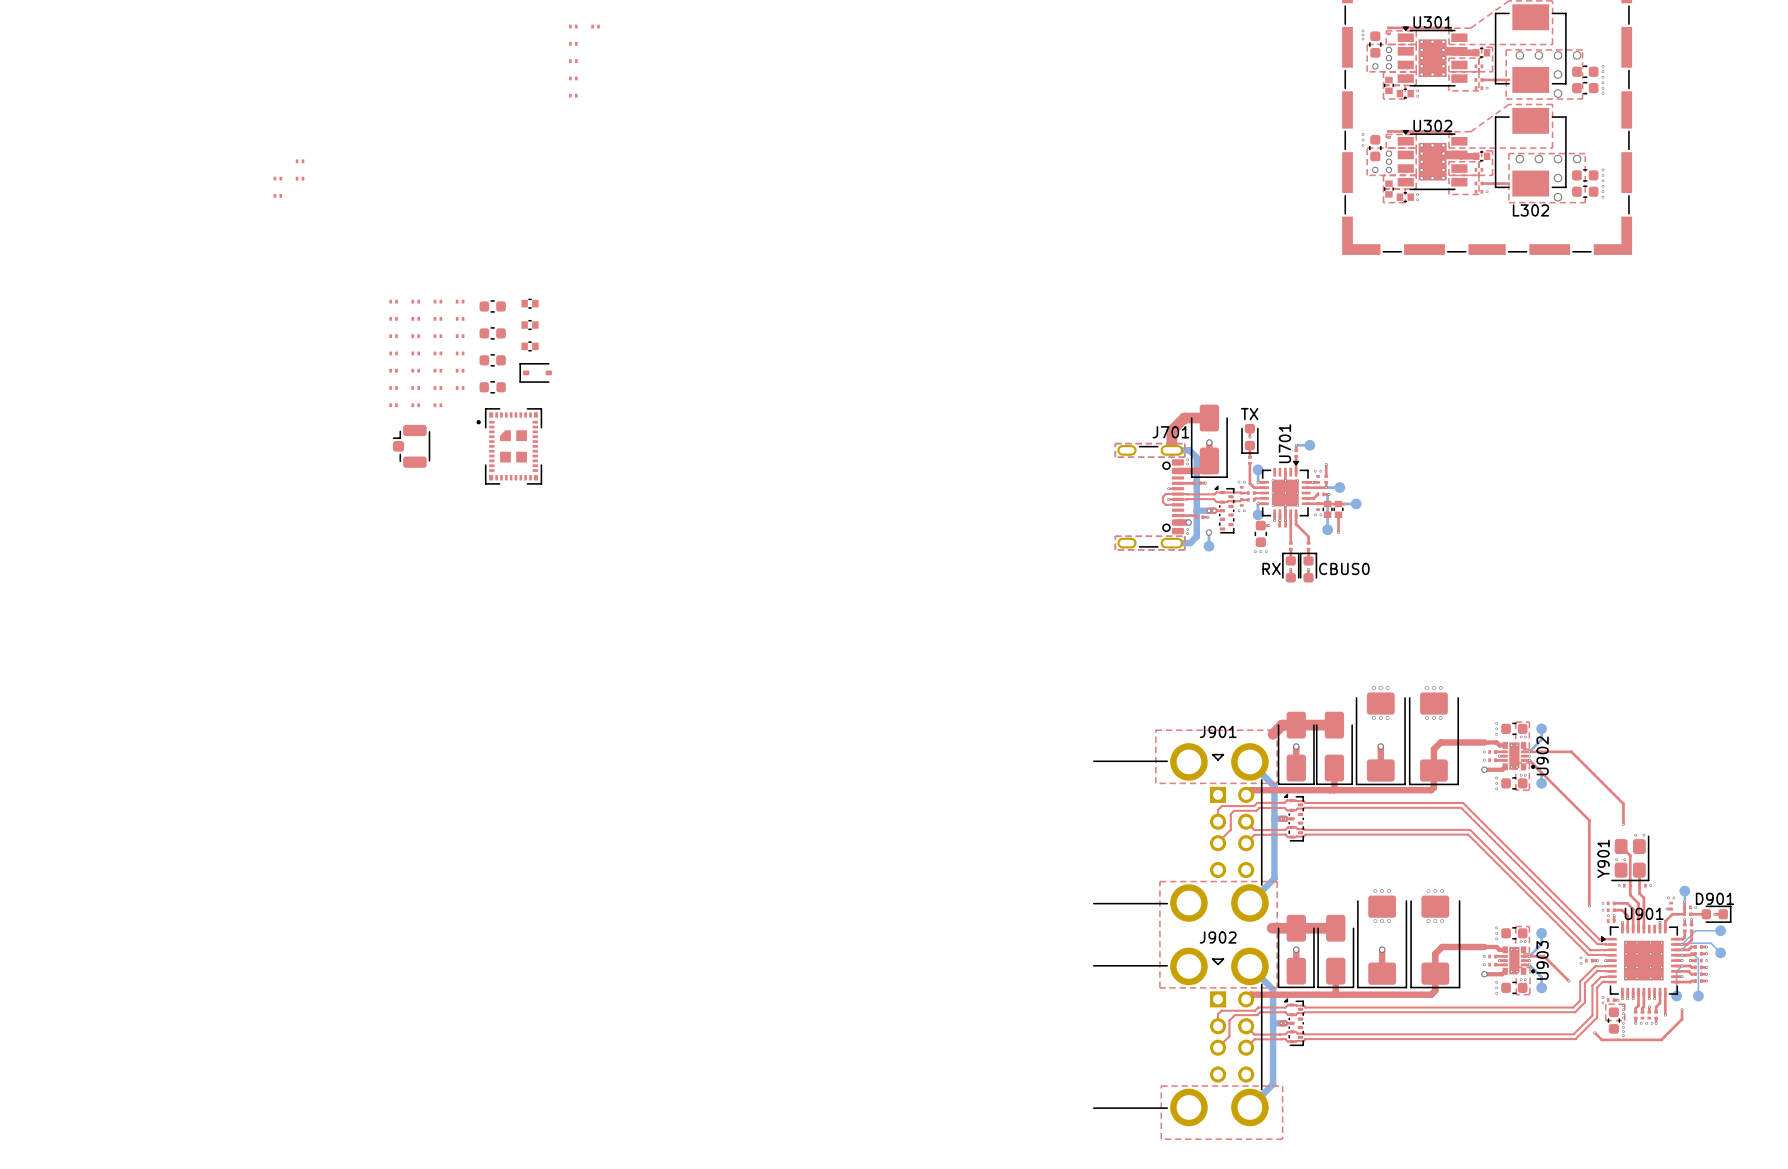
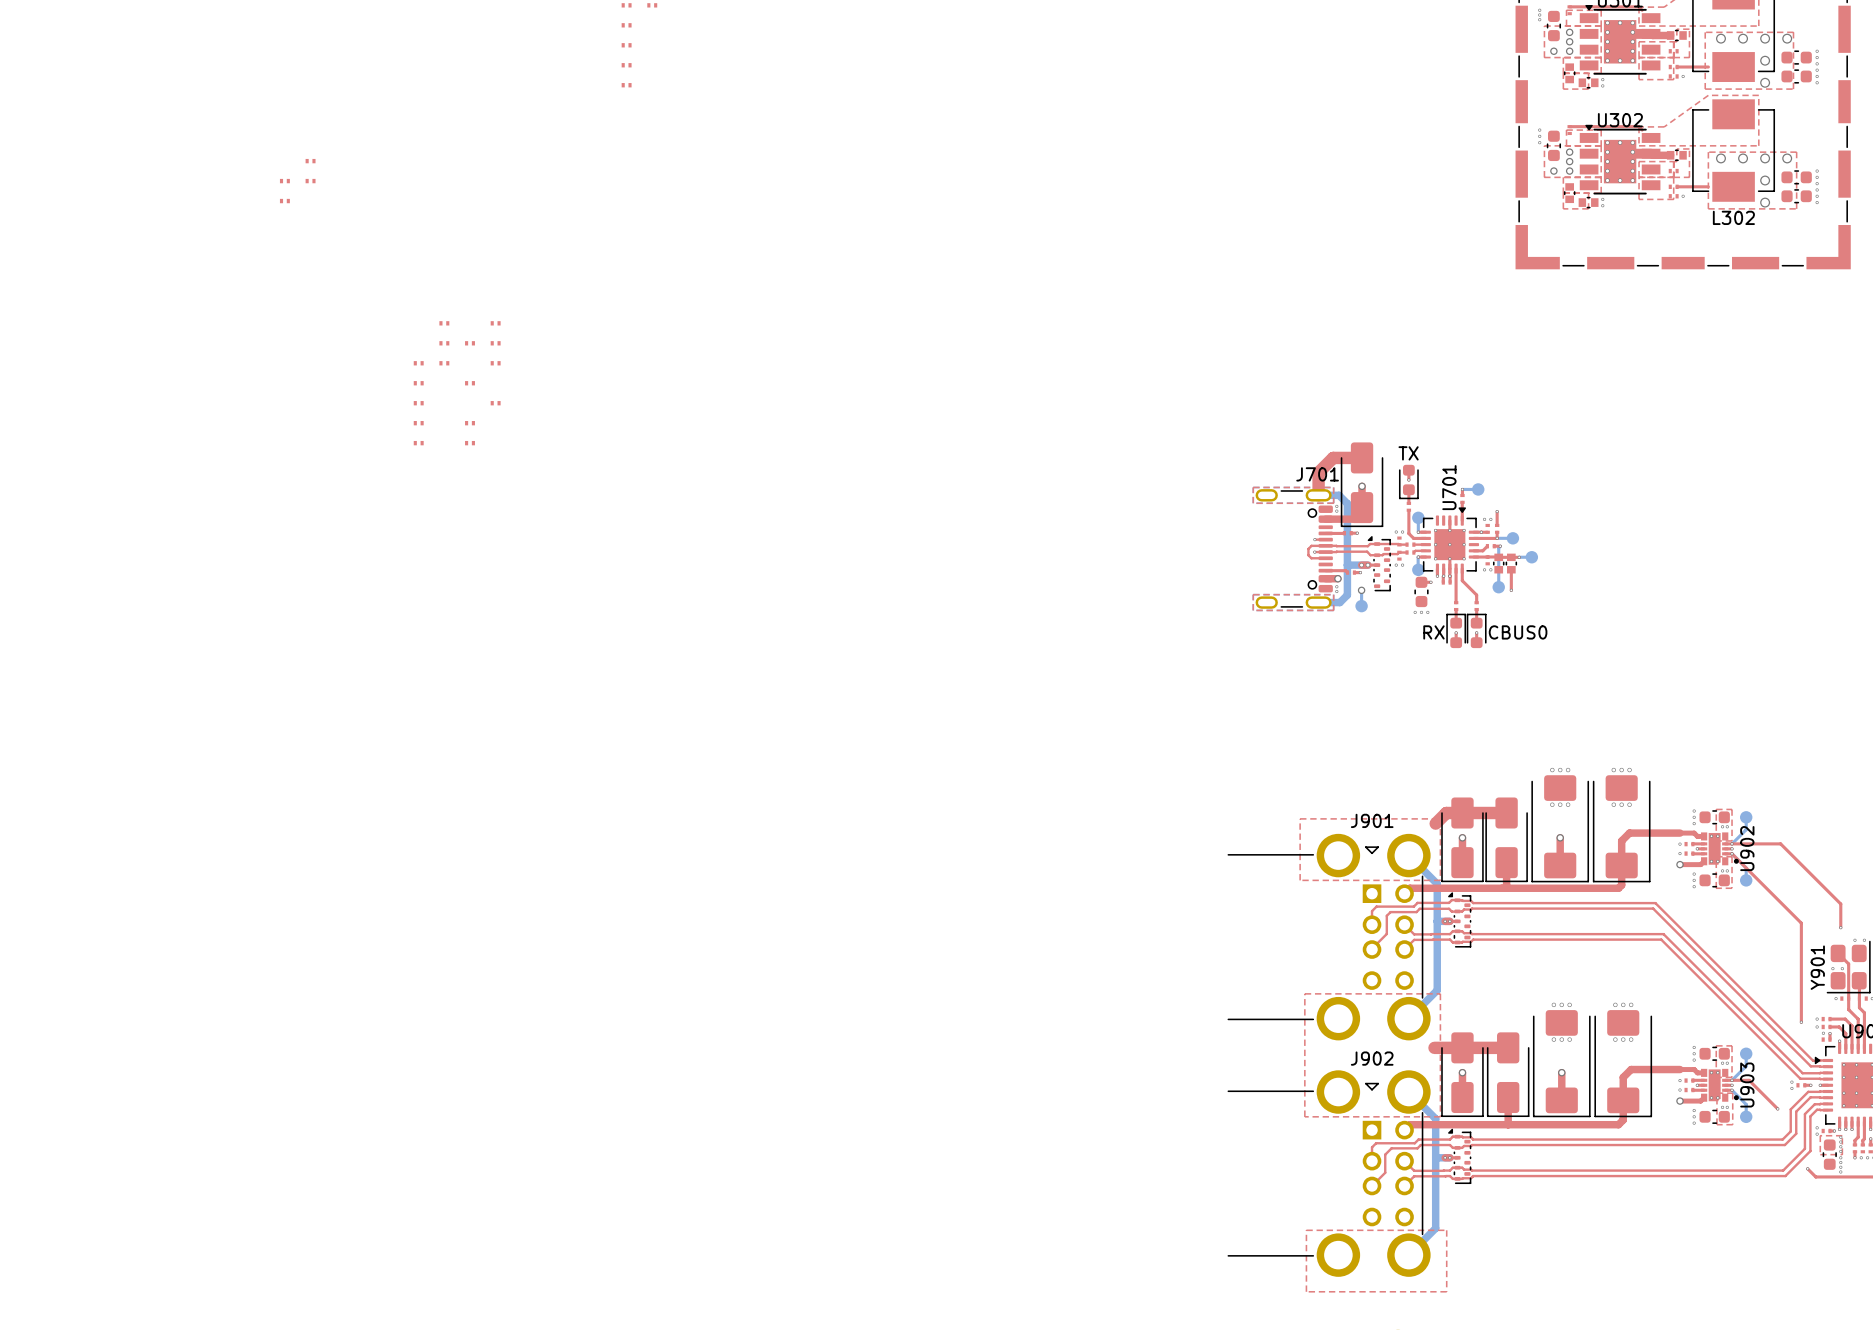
part: (393, 301) -> none
part: (437, 301) -> none
part: (530, 303) -> none
part: (492, 306) -> none
part: (393, 318) -> none
part: (530, 325) -> none
part: (492, 333) -> none
part: (437, 336) -> none
part: (530, 346) -> none
part: (415, 353) -> none
part: (460, 353) -> none
part: (492, 360) -> none
part: (415, 370) -> none
part: (437, 370) -> none
part: (535, 372) -> none
part: (415, 387) -> none
part: (460, 387) -> none
part: (492, 387) -> none
part: (415, 405) -> none
part: (411, 446) -> none
part: (509, 446) -> none

